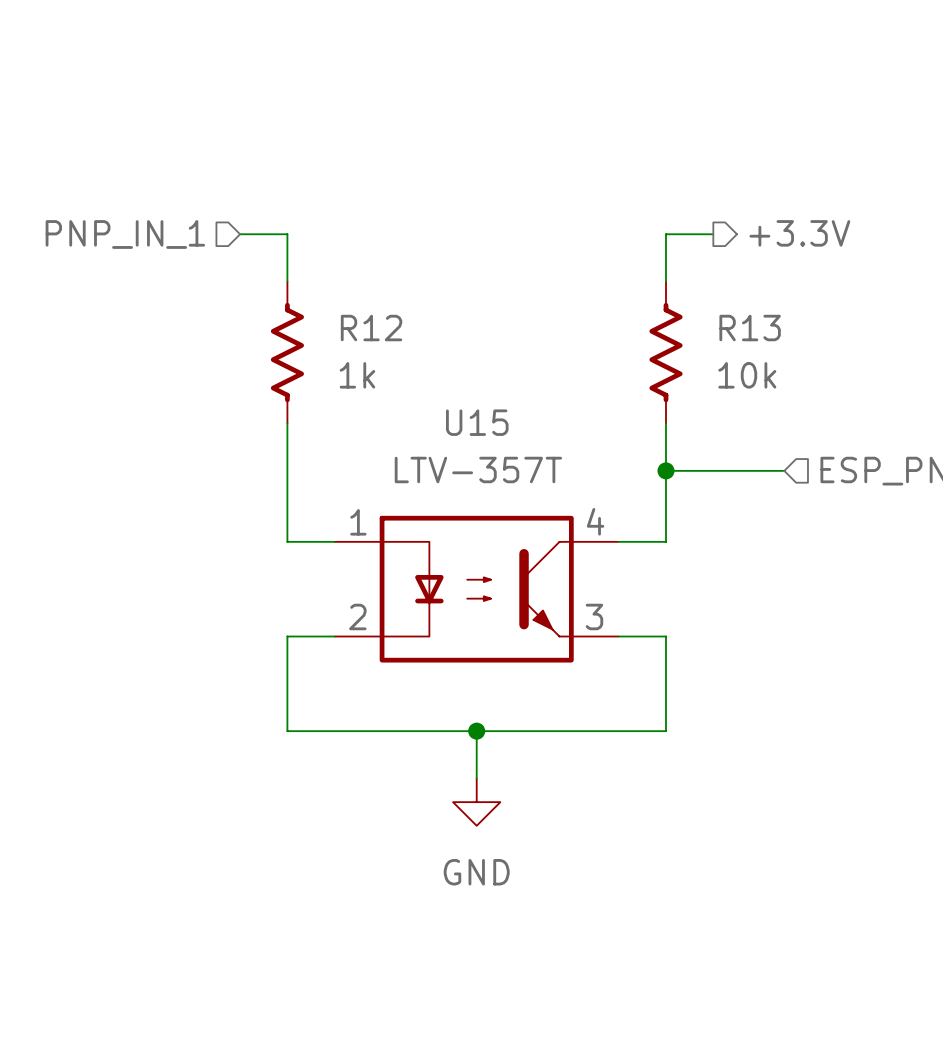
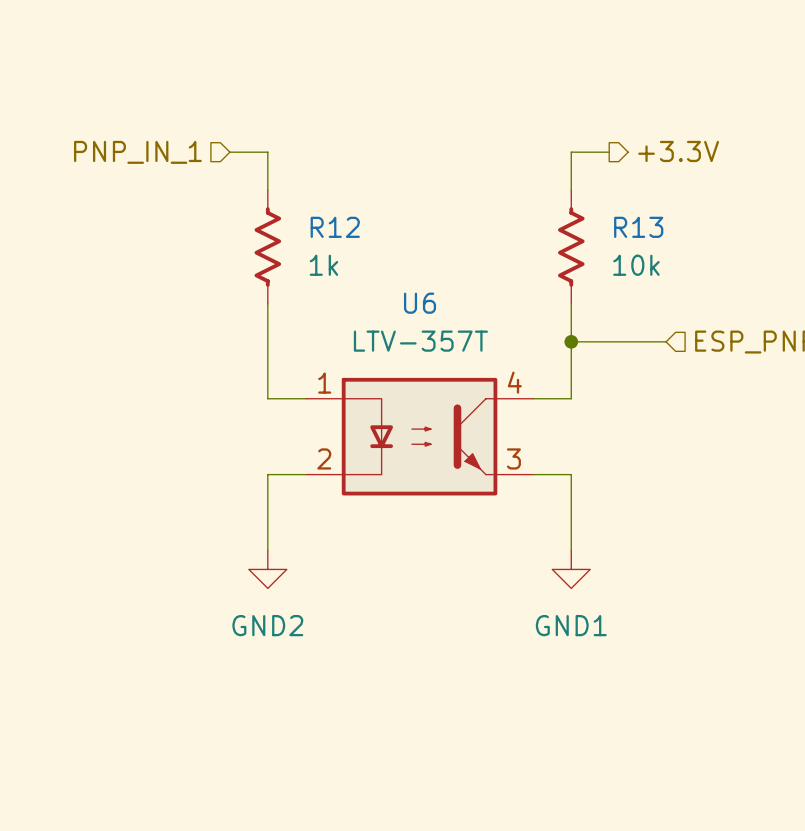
U15 name: U15 (477, 422) -> U6 (420, 303)
wire: (287, 731) (666, 731) -> none
wire: (476, 731) (476, 778) -> none
junction: (476, 731) -> none
power symbol: none -> GND2 (267, 569)
power symbol: none -> GND1 (571, 569)
power symbol: GND (476, 802) -> none

